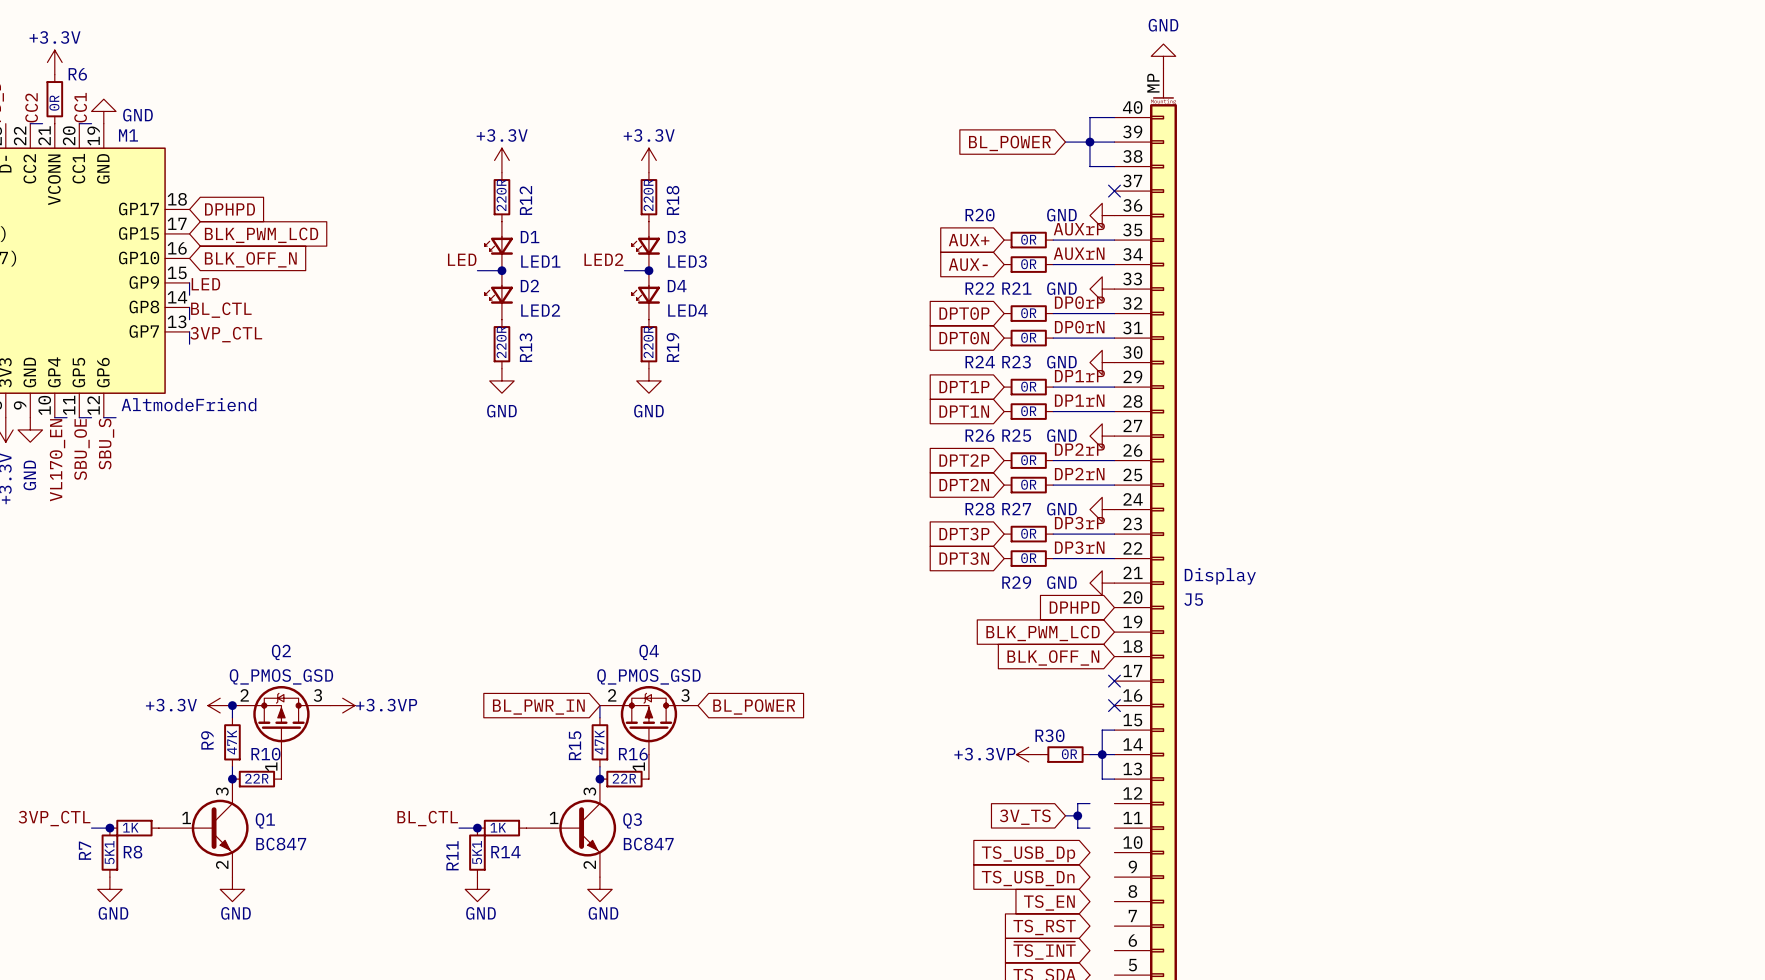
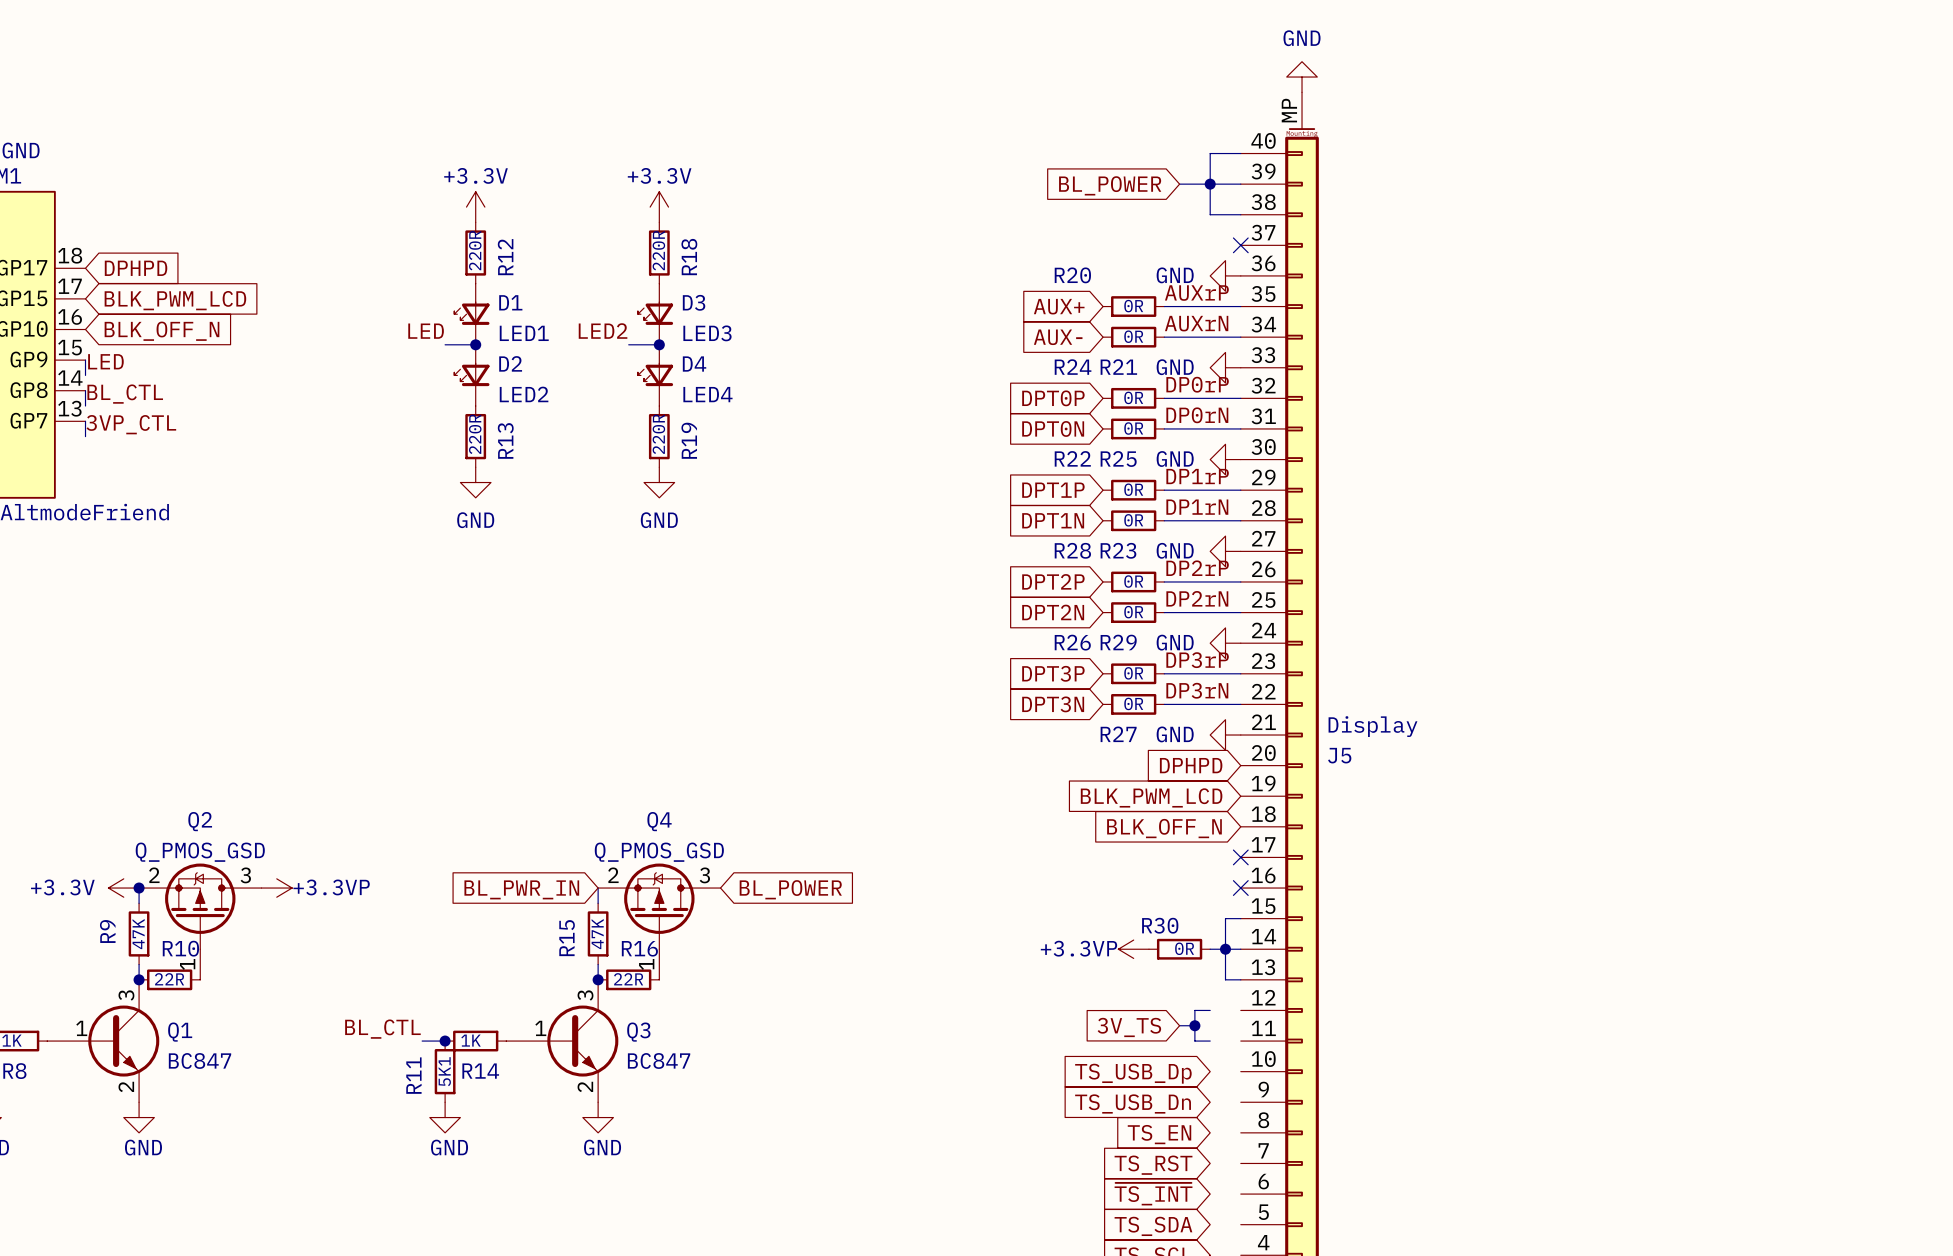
R22 name: R22 (979, 288) -> R24 (1073, 367)
R24 name: R24 (980, 362) -> R22 (1072, 458)
R23 name: R23 (1016, 362) -> R25 (1118, 459)
R26 name: R26 (979, 435) -> R28 (1072, 550)
R25 name: R25 (1016, 435) -> R23 (1118, 550)
R28 name: R28 (980, 509) -> R26 (1072, 642)
R27 name: R27 (1016, 509) -> R29 (1118, 642)
R29 name: R29 (1016, 582) -> R27 (1118, 734)

